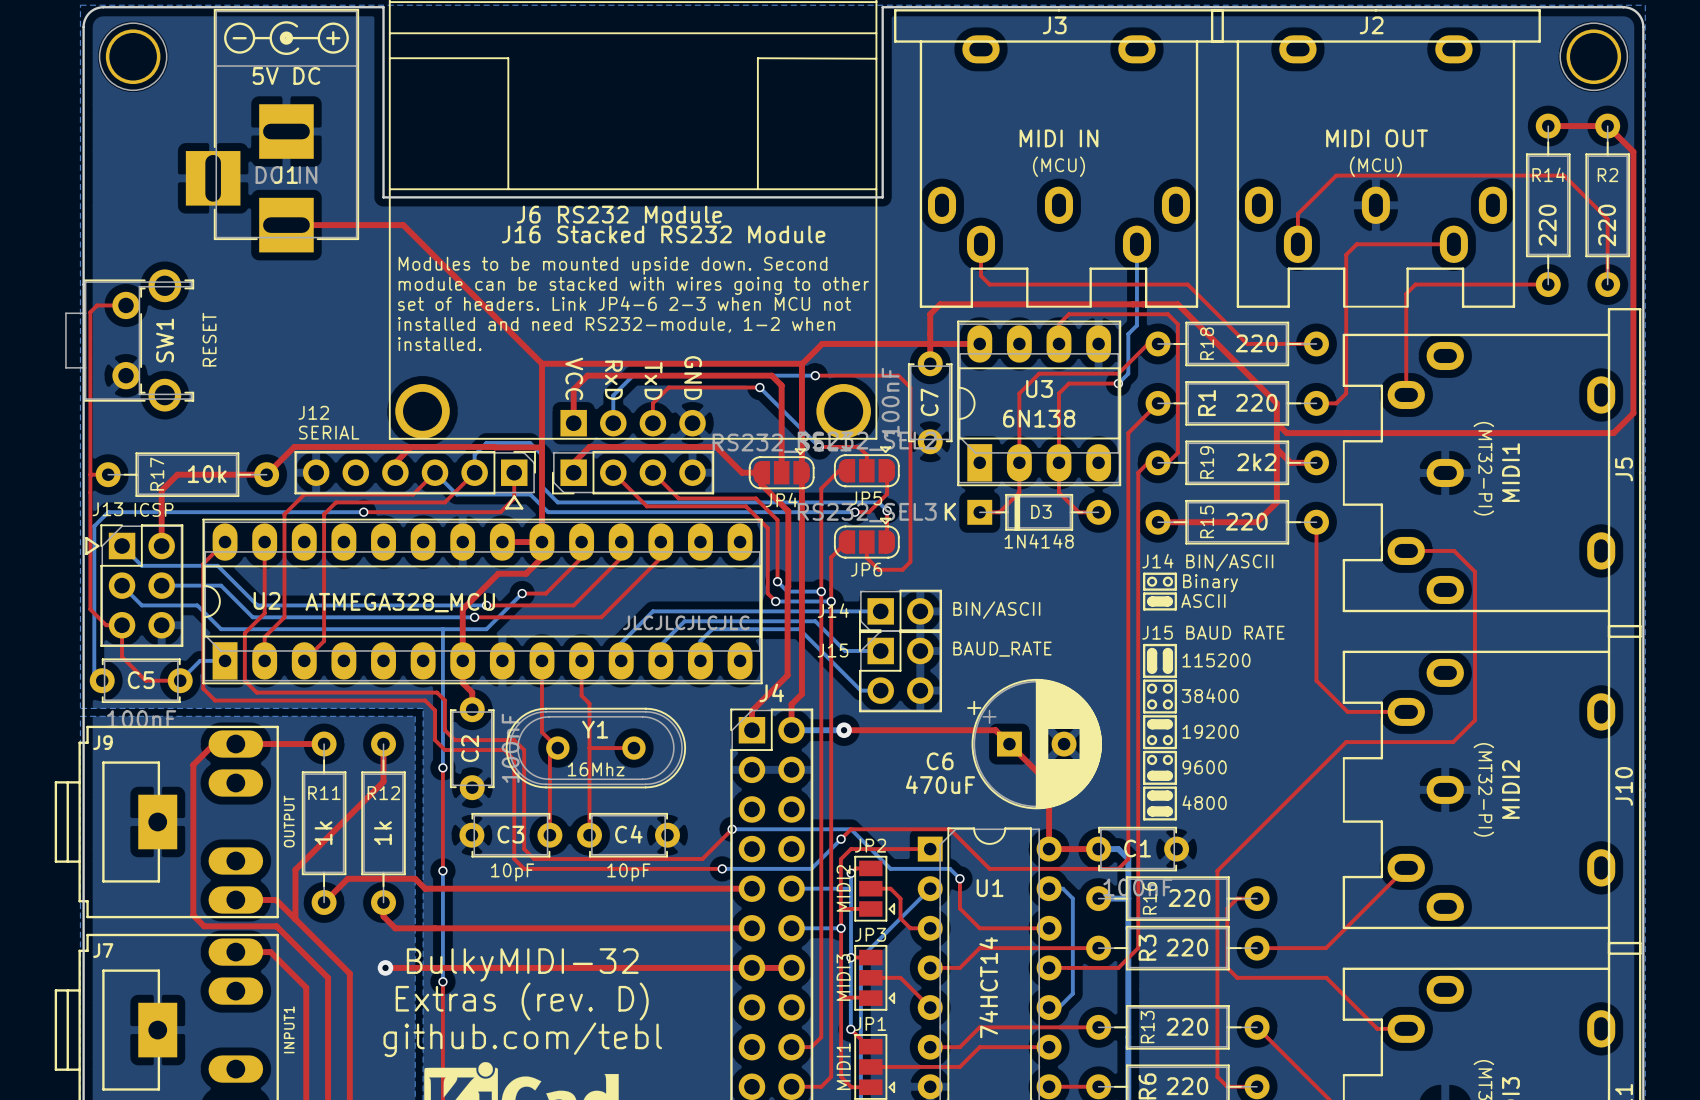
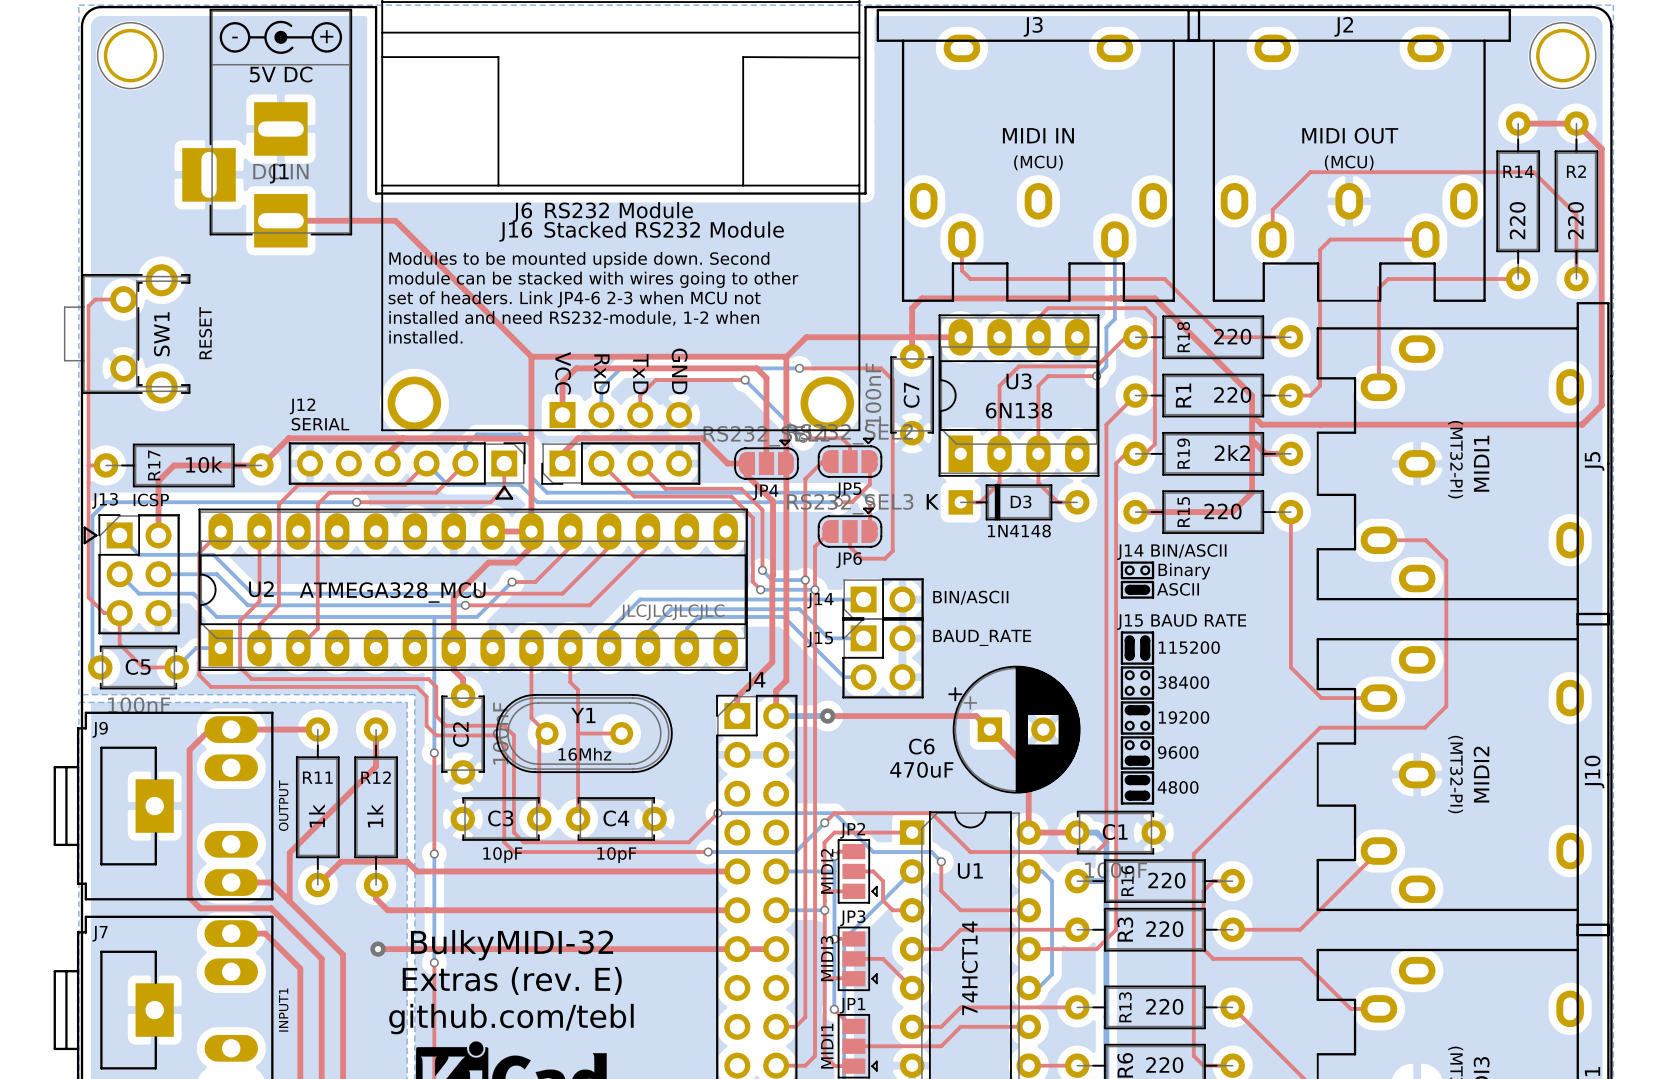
text: Extras (rev. D) (522, 1001) -> Extras (rev. E) (512, 980)

